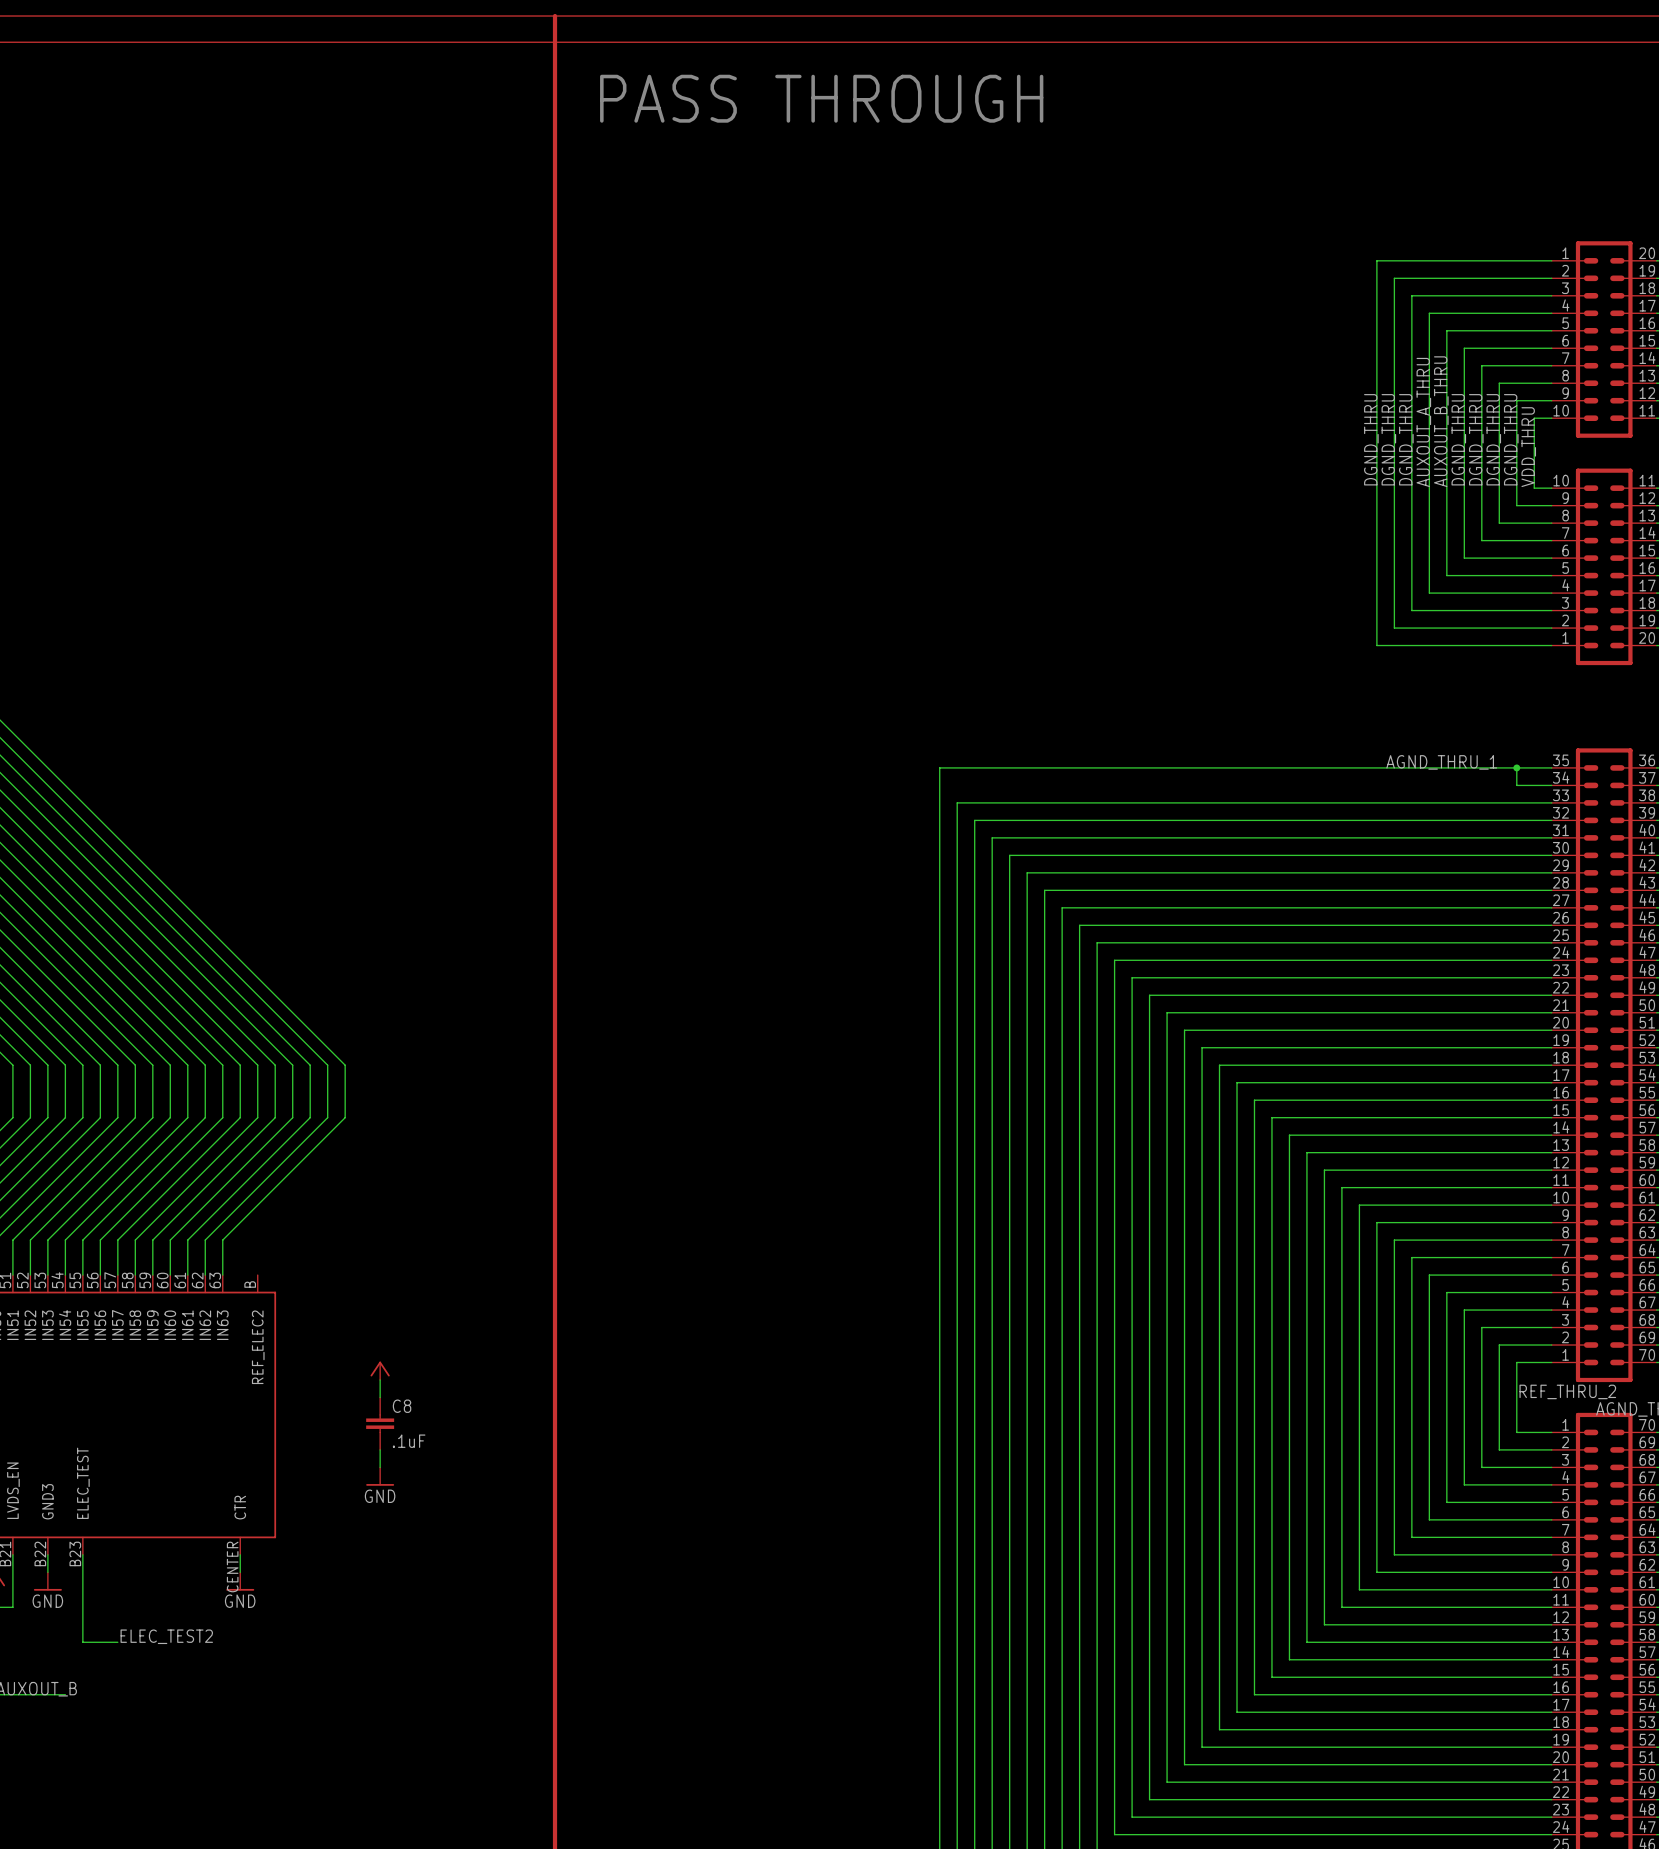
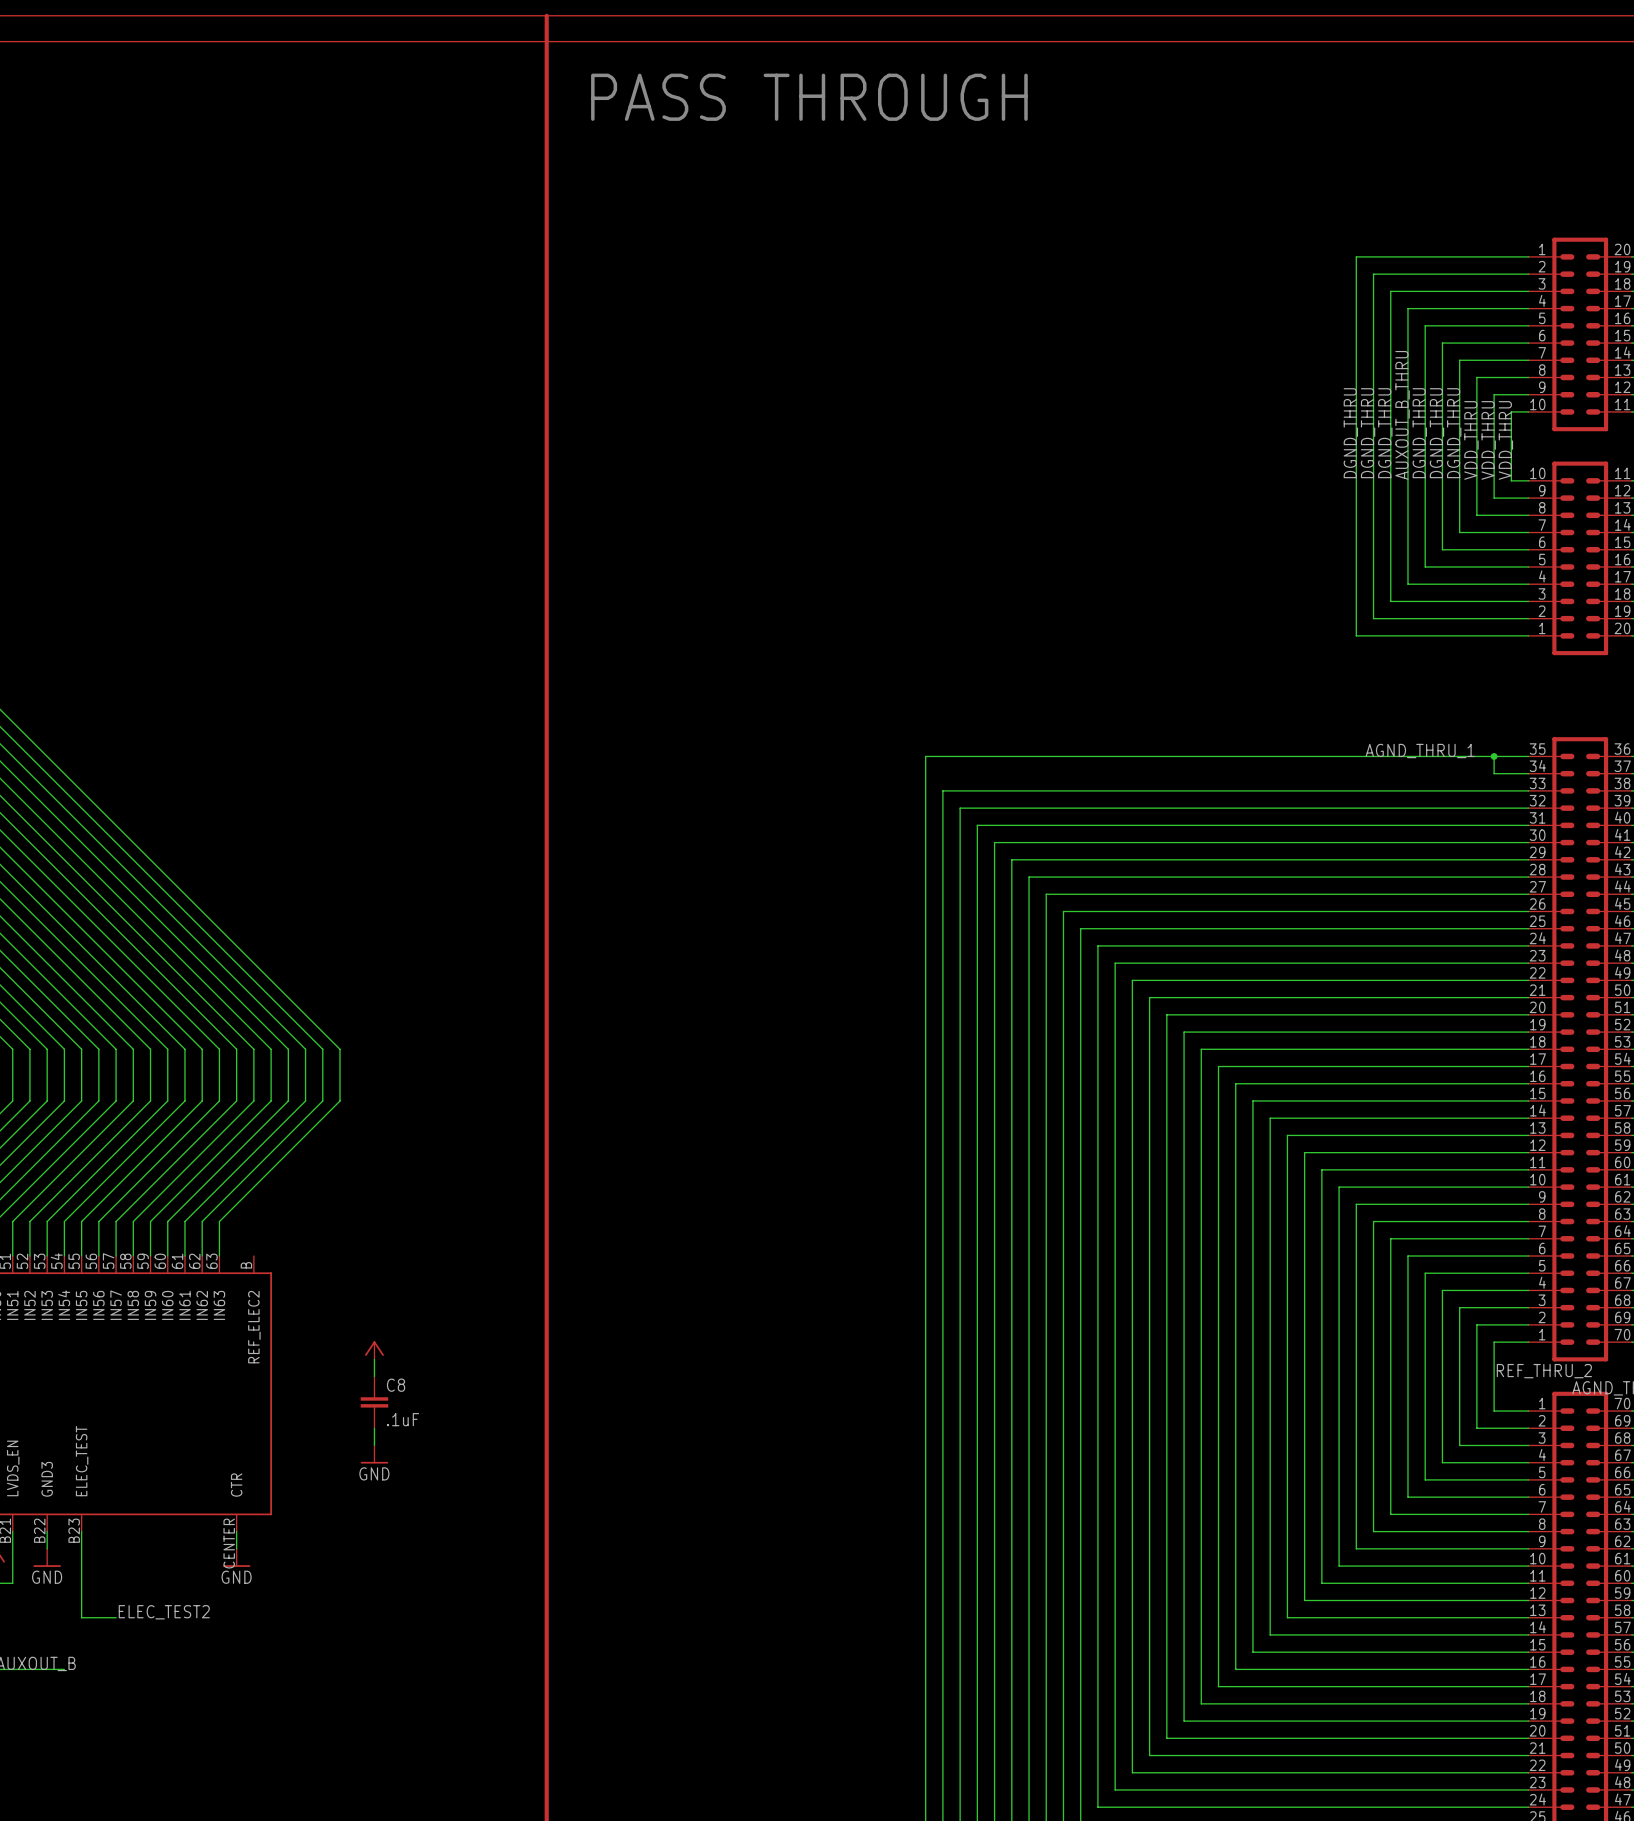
label: AUXOUT_B_THRU (1441, 421) -> DGND_THRU (1419, 433)
label: AUXOUT_A_THRU (1423, 422) -> AUXOUT_B_THRU (1402, 415)
label: DGND_THRU (1493, 439) -> VDD_THRU (1471, 440)
label: DGND_THRU (1511, 439) -> VDD_THRU (1488, 440)

